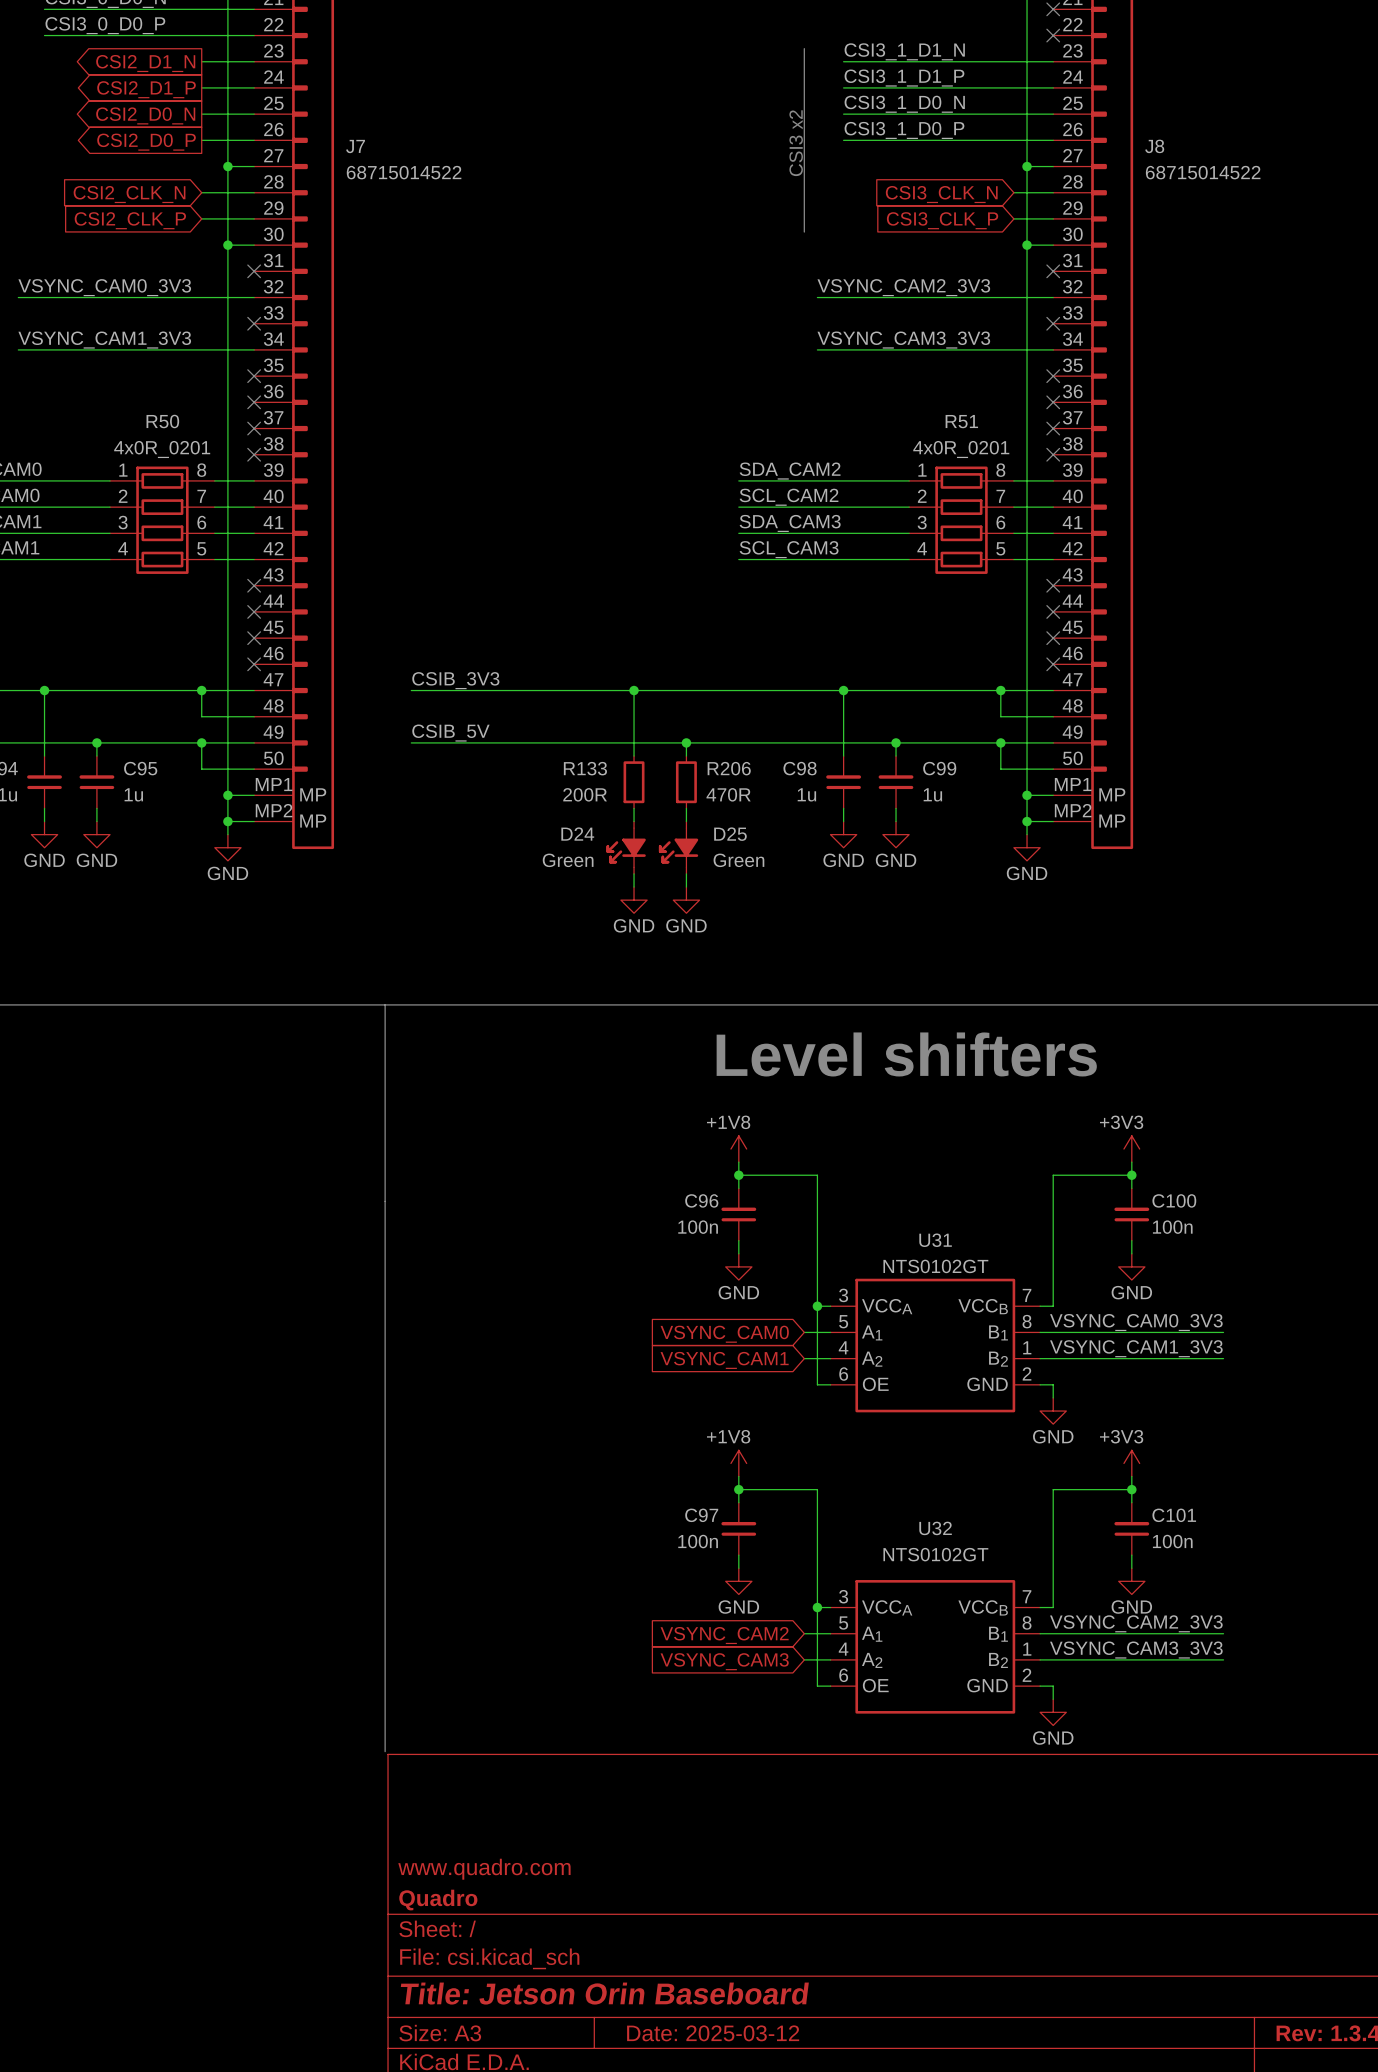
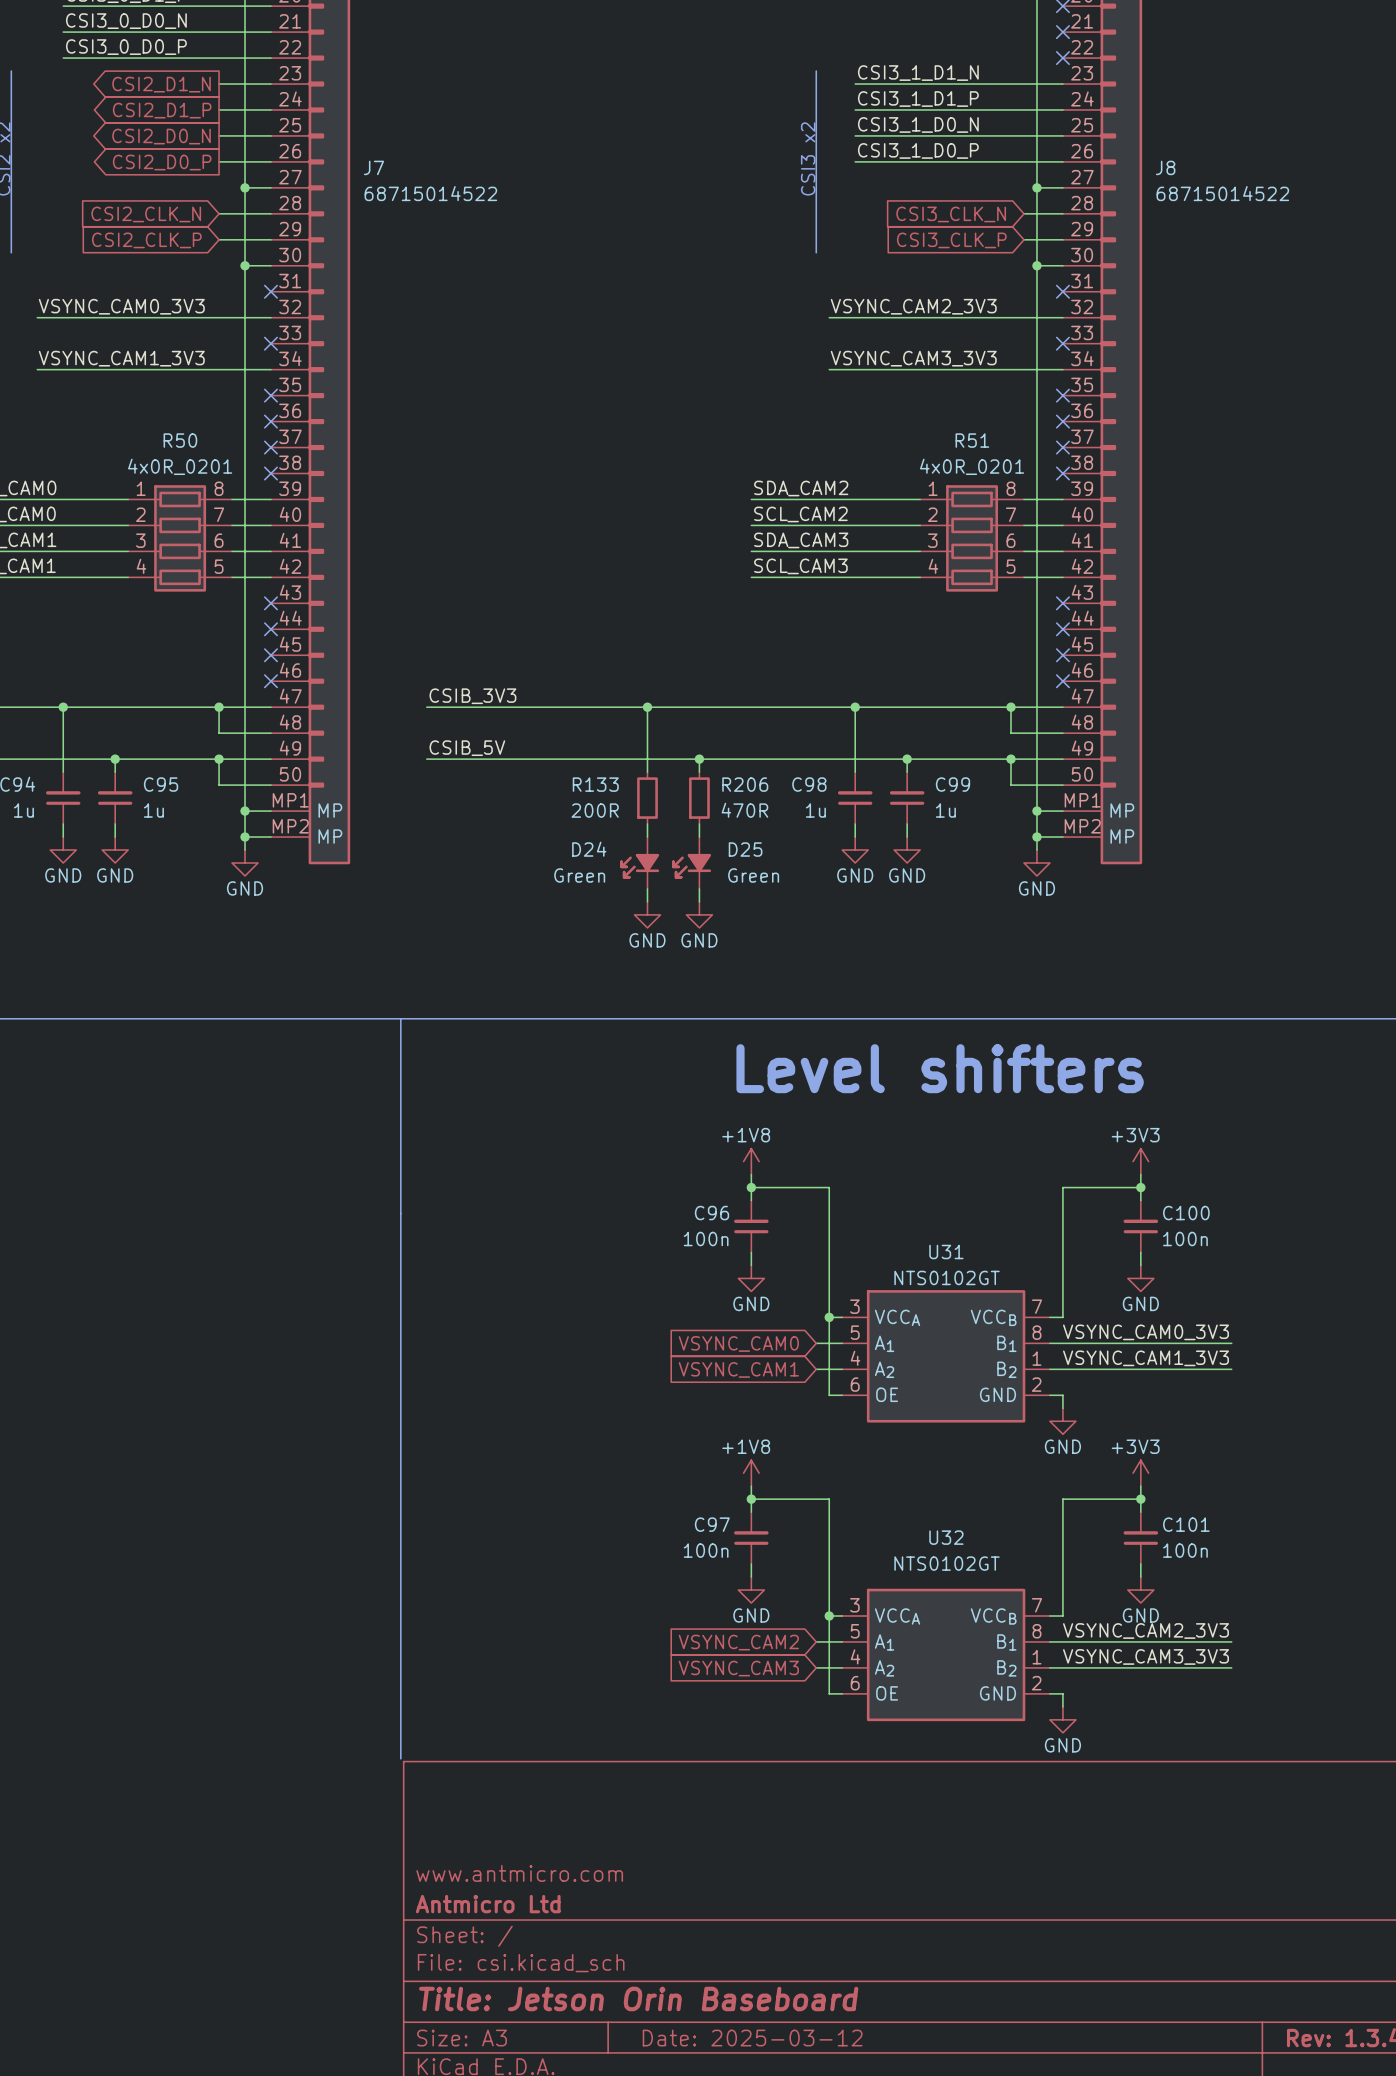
title block: www.quadro.com (484, 1869) -> www.antmicro.com (519, 1873)
title block: Quadro (438, 1900) -> Antmicro Ltd (488, 1904)

